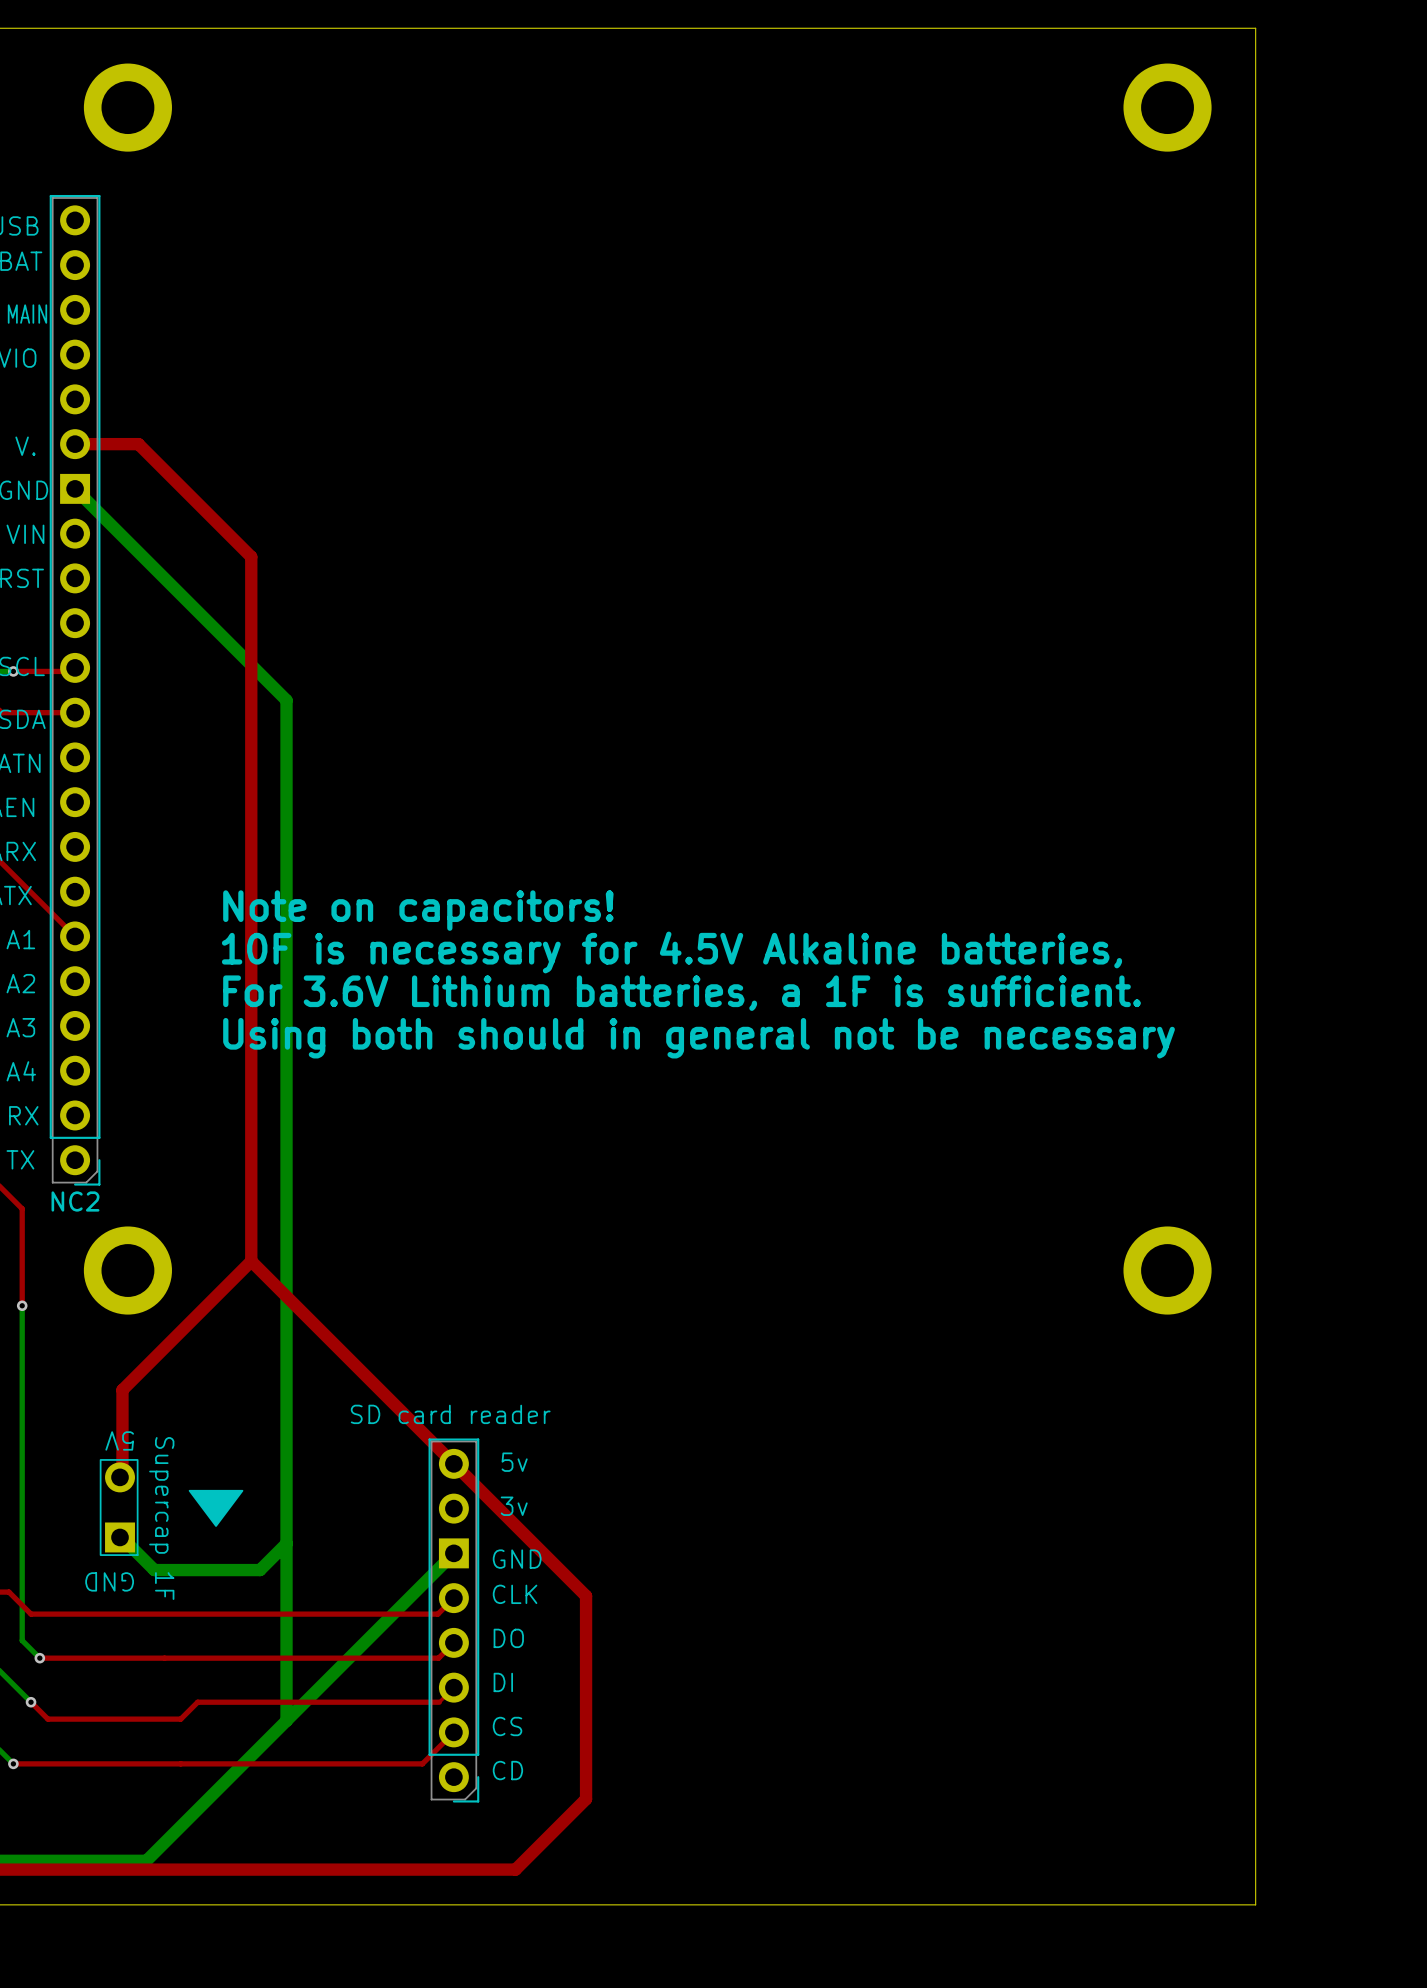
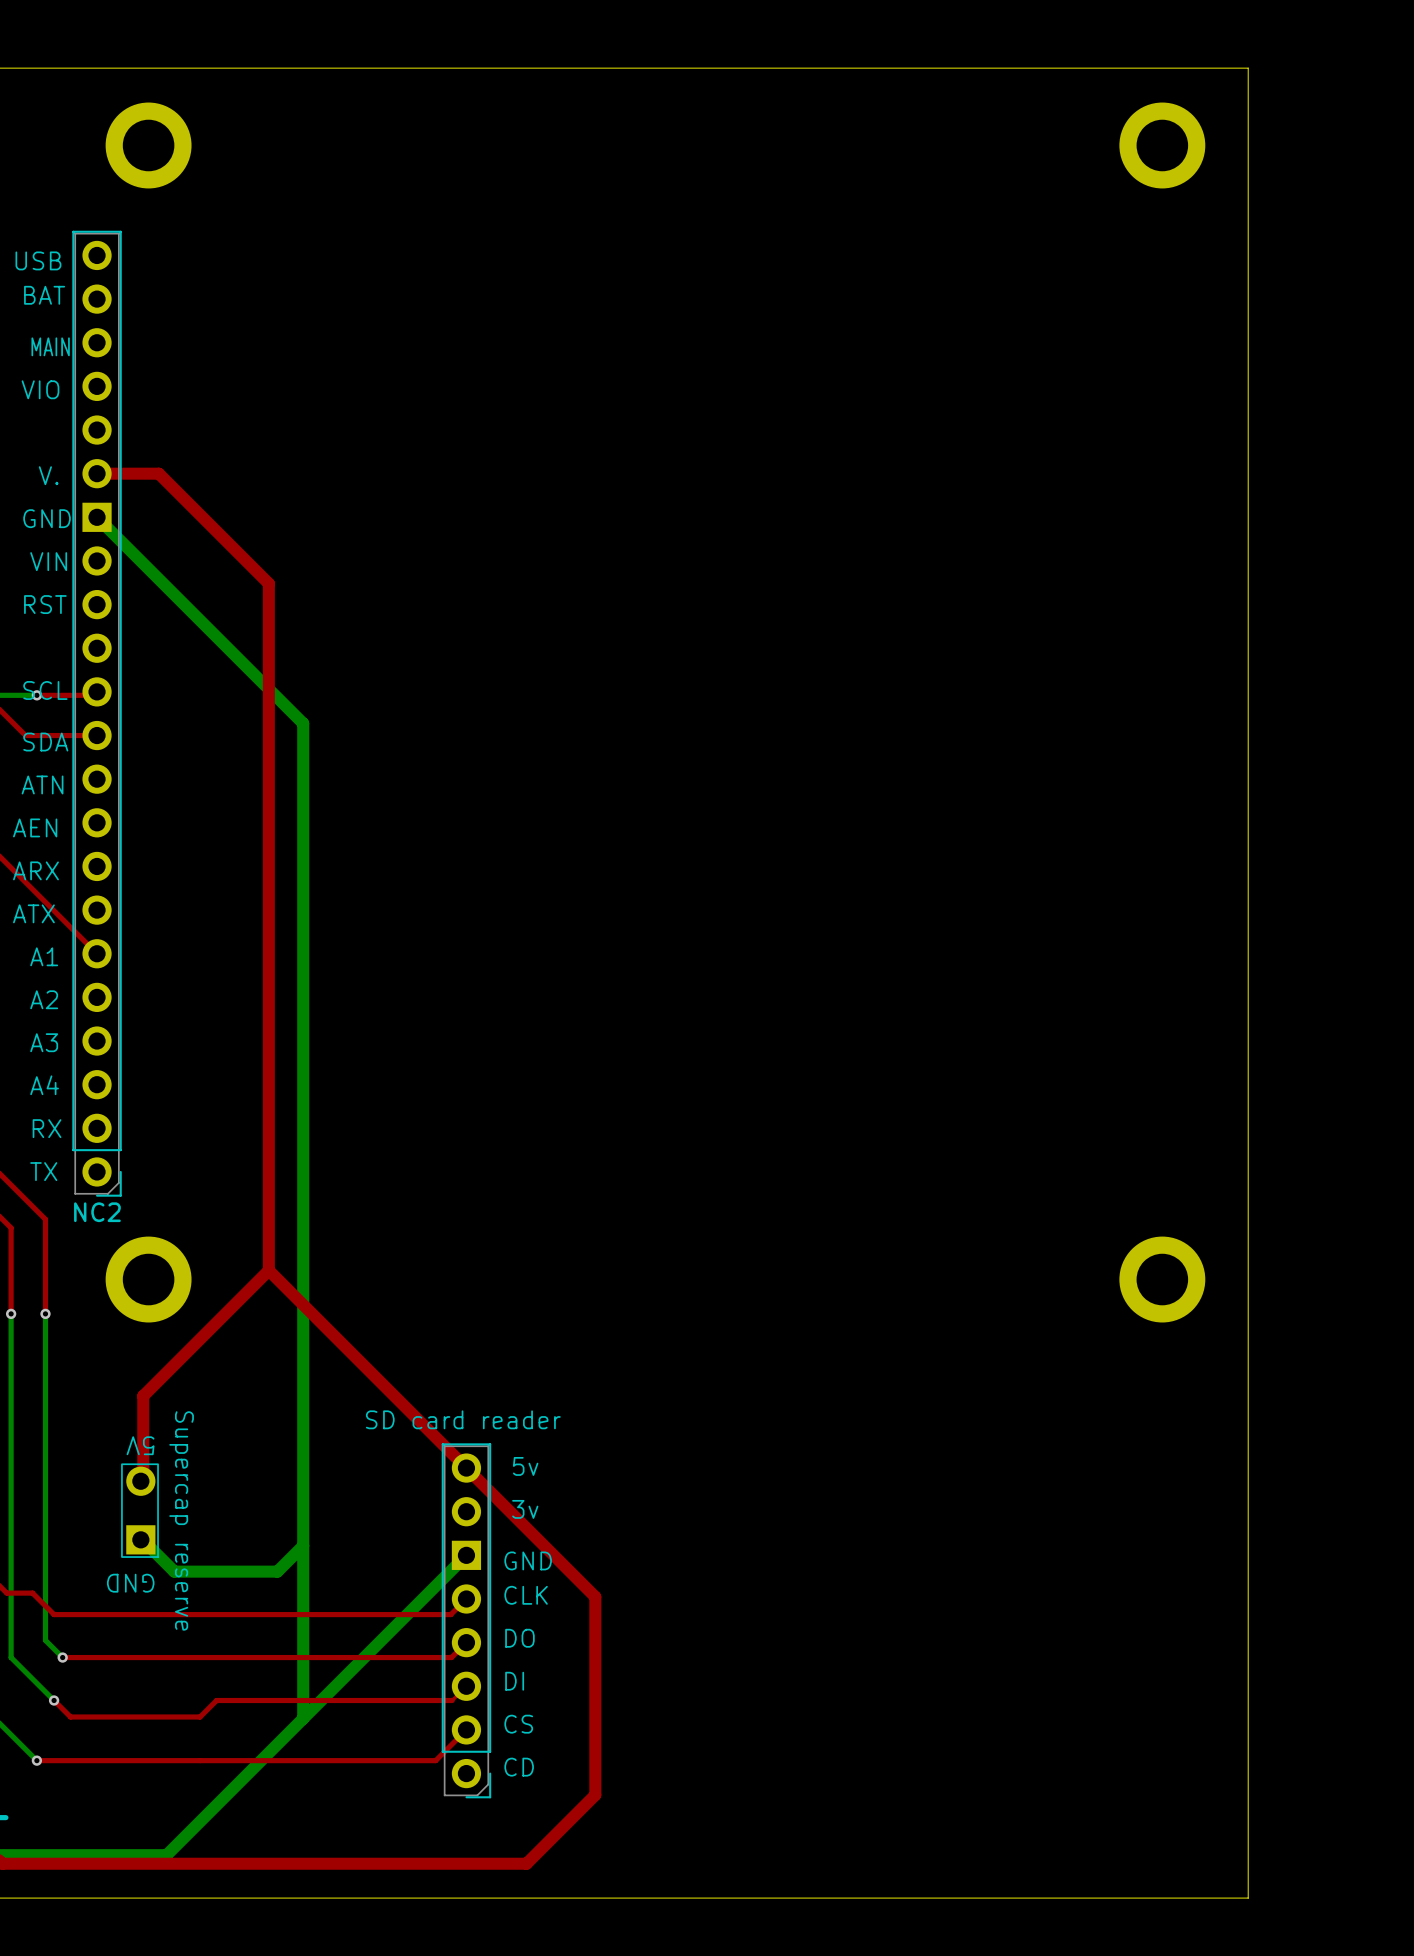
text: Note on capacitors! (418, 910) -> none
text: 10F is necessary for 4.5V Alkaline batteries, (671, 952) -> none
text: For 3.6V Lithium batteries, a 1F is sufficient. (682, 993) -> none
text: Using both should in general not be necessary (699, 1038) -> none
drawing: [188, 1489, 244, 1527] -> none
Supercap 1F name: Supercap 1F (161, 1518) -> Supercap reserve (181, 1520)

